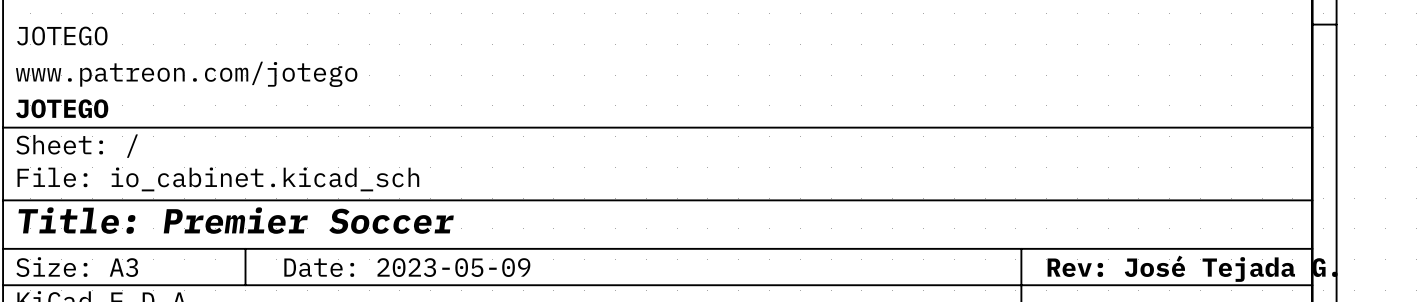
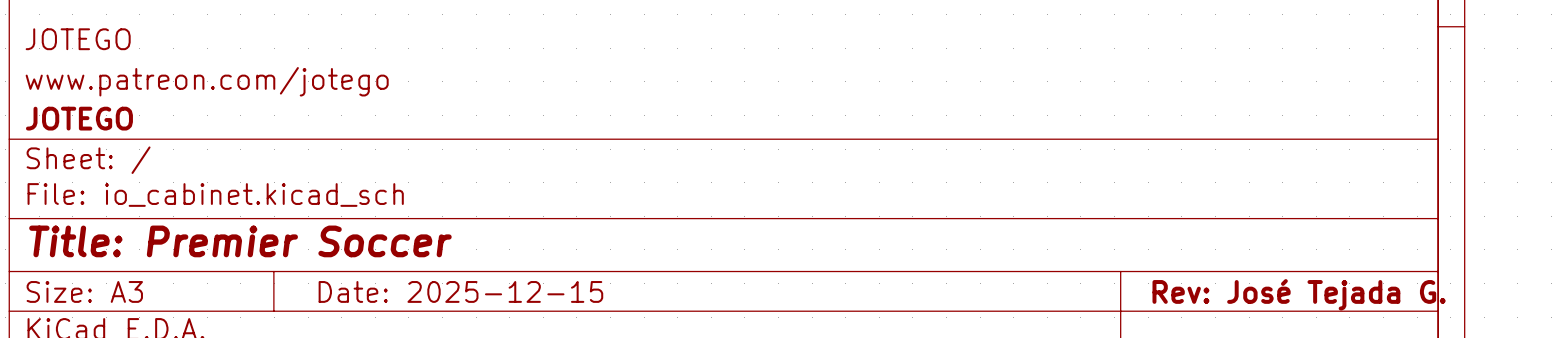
title block: Date: 2023-05-09 (407, 267) -> Date: 2025-12-15 (460, 291)

